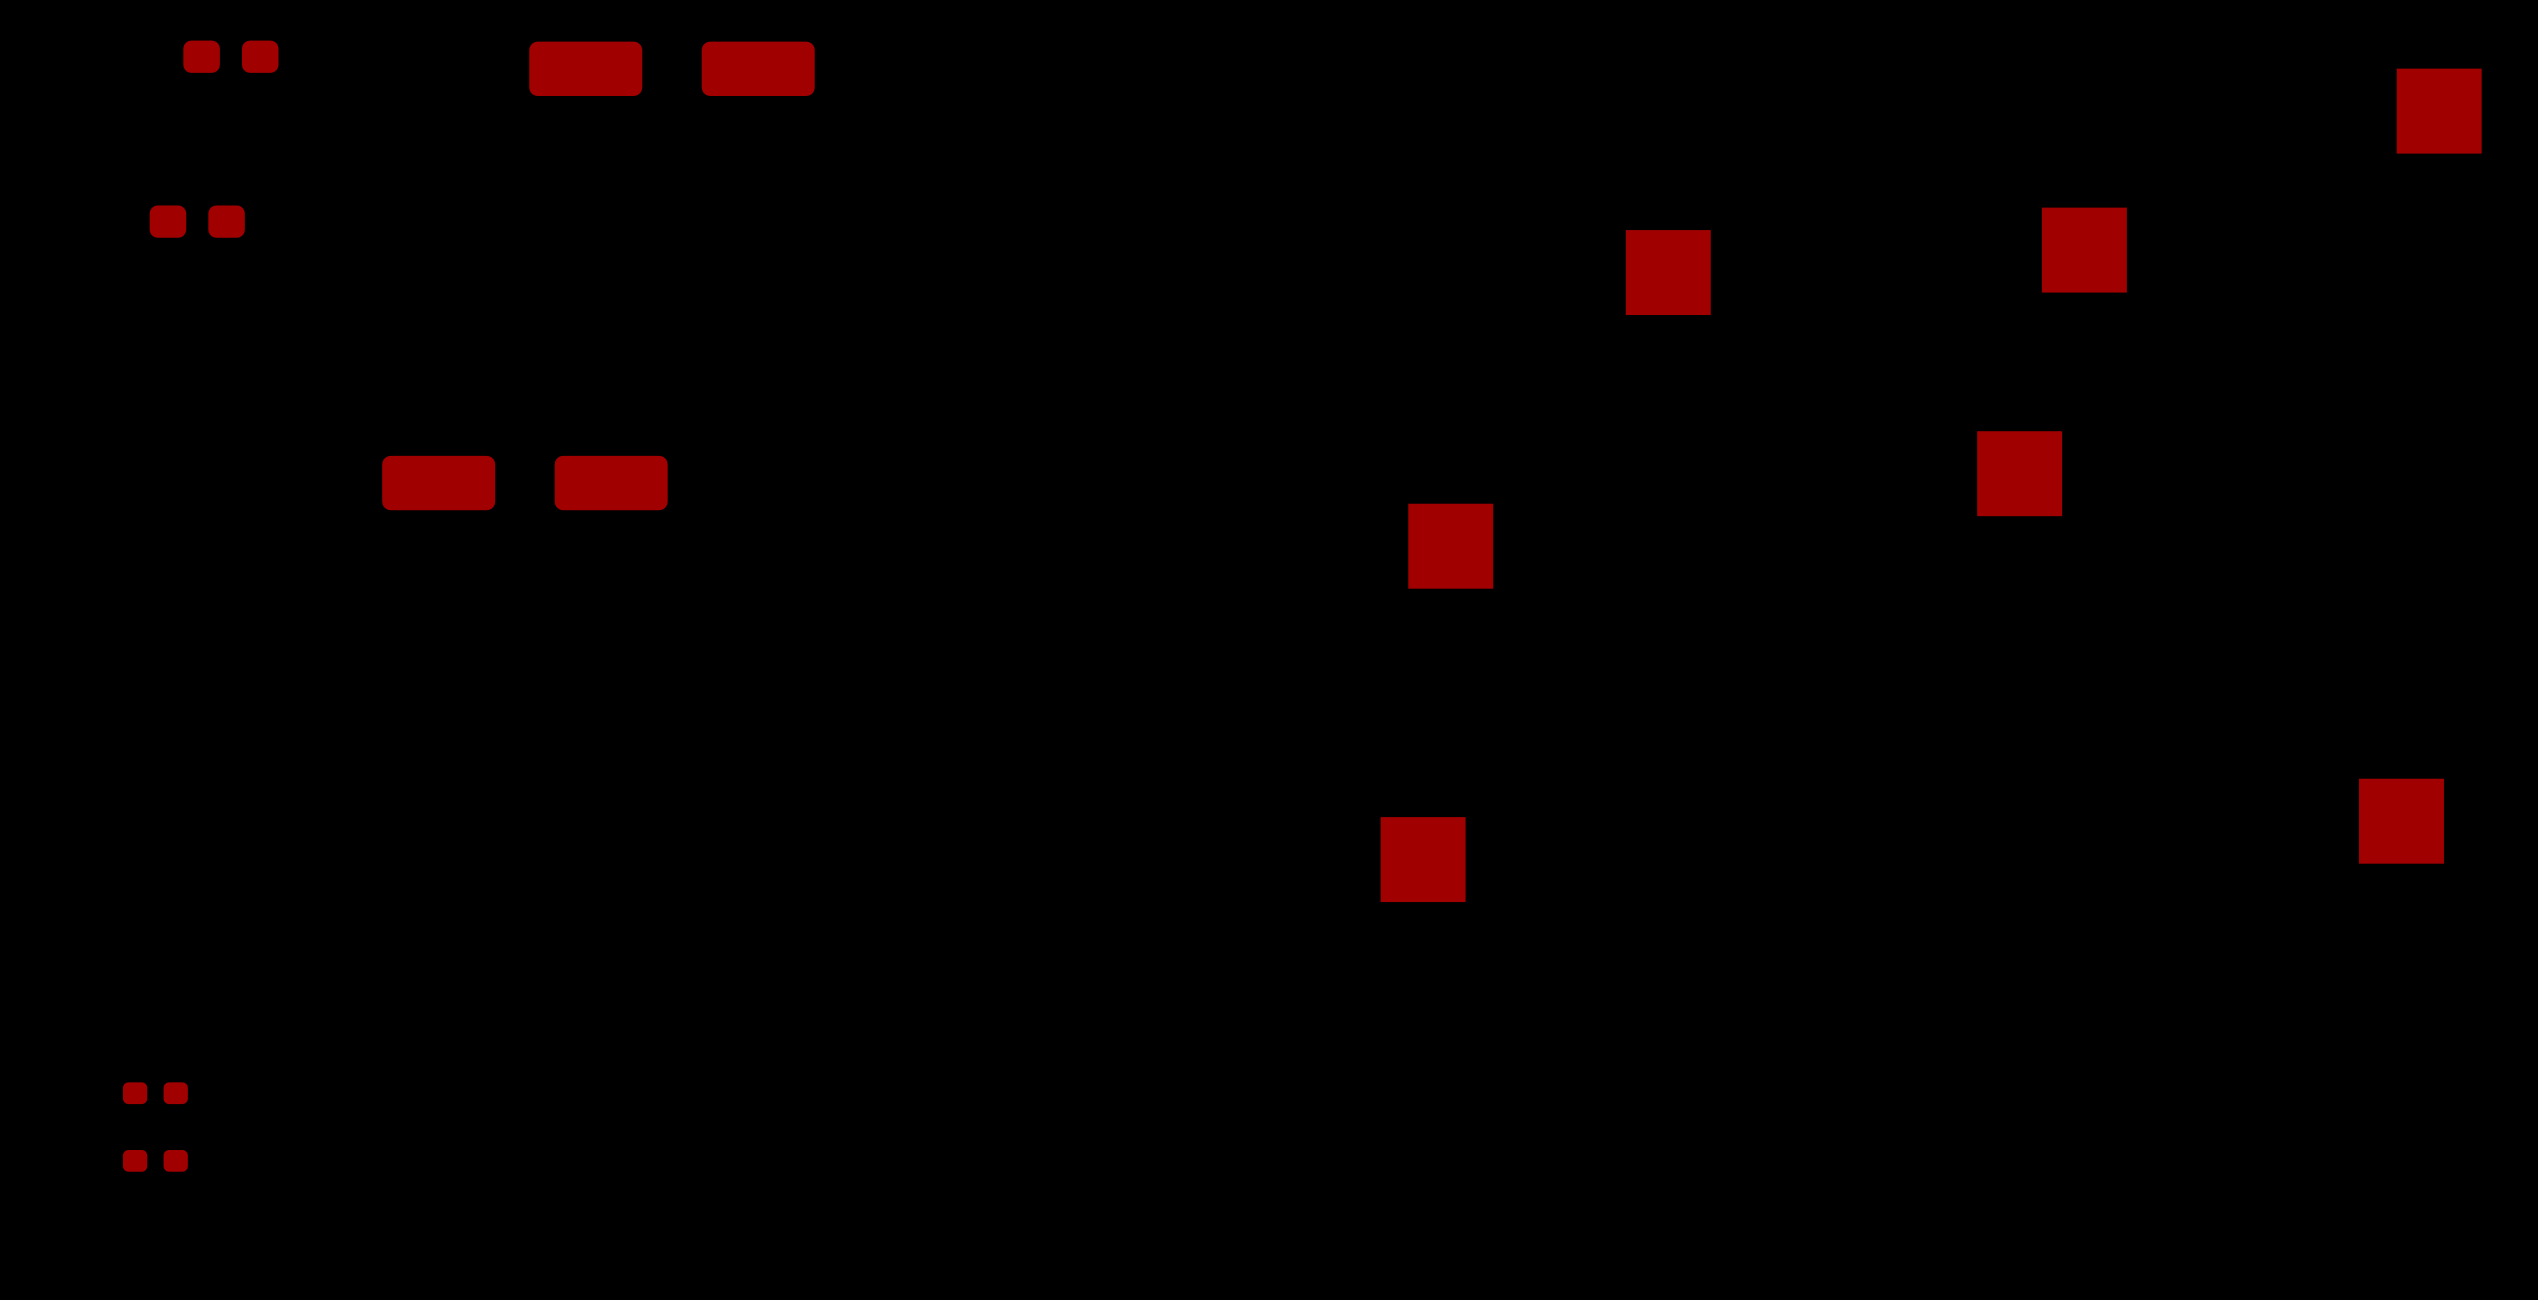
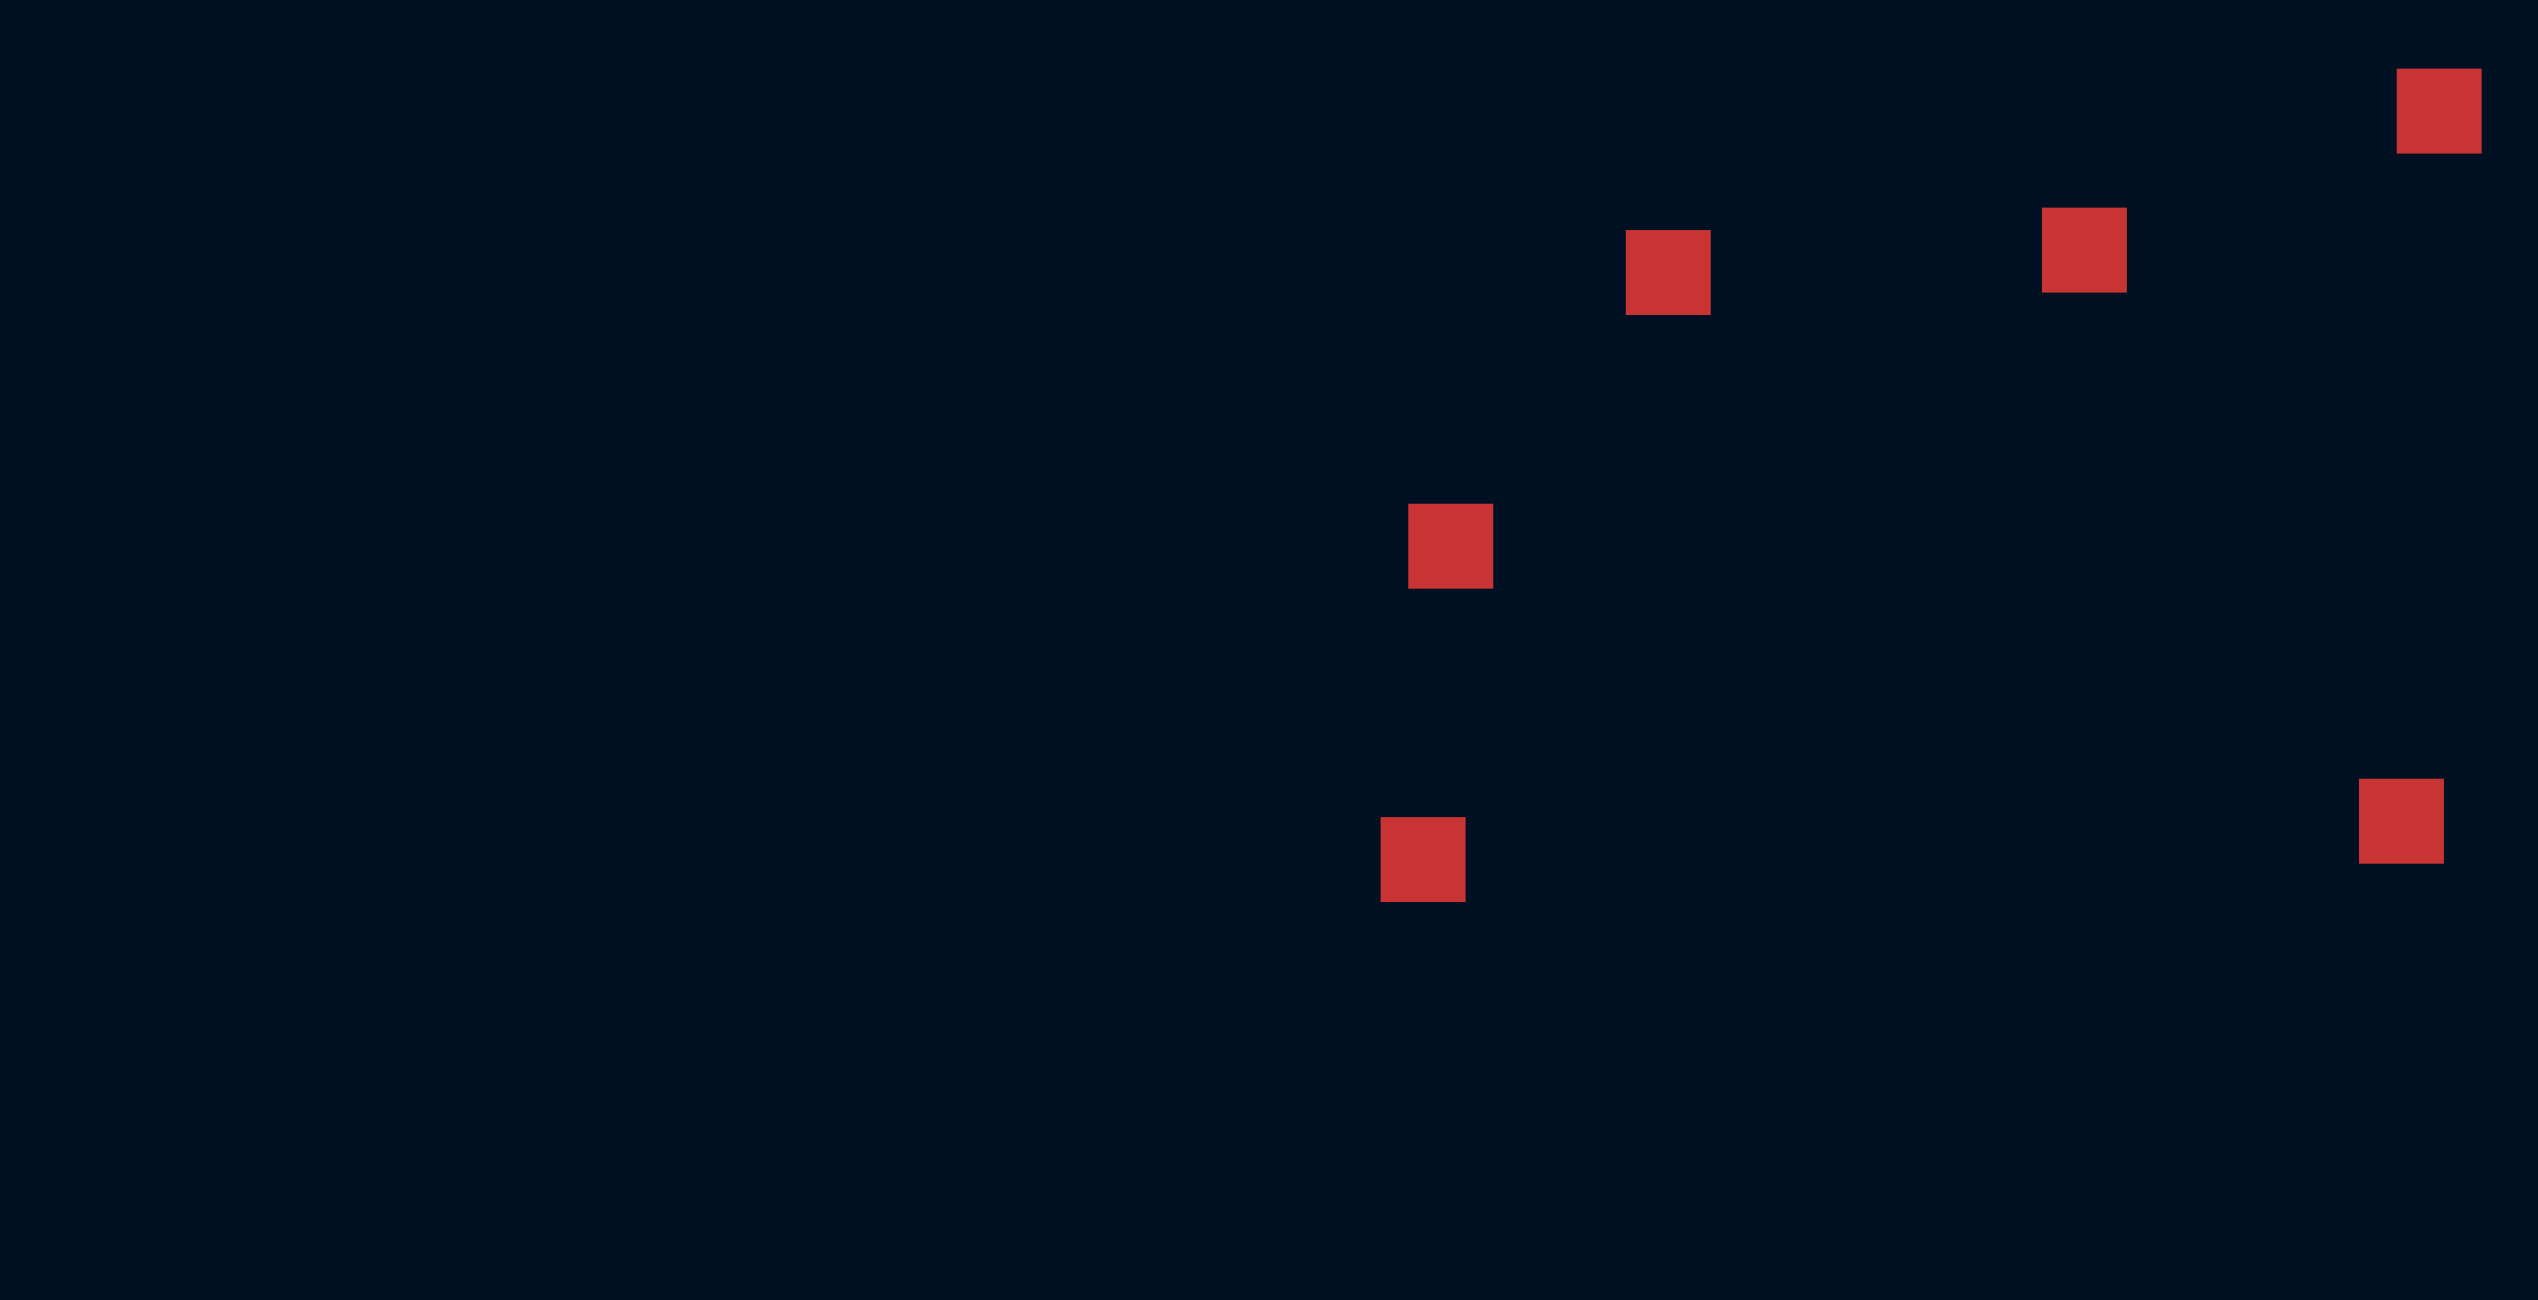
part: (230, 56) -> none
part: (671, 68) -> none
part: (197, 221) -> none
part: (2019, 473) -> none
part: (524, 483) -> none
part: (155, 1093) -> none
part: (155, 1160) -> none

